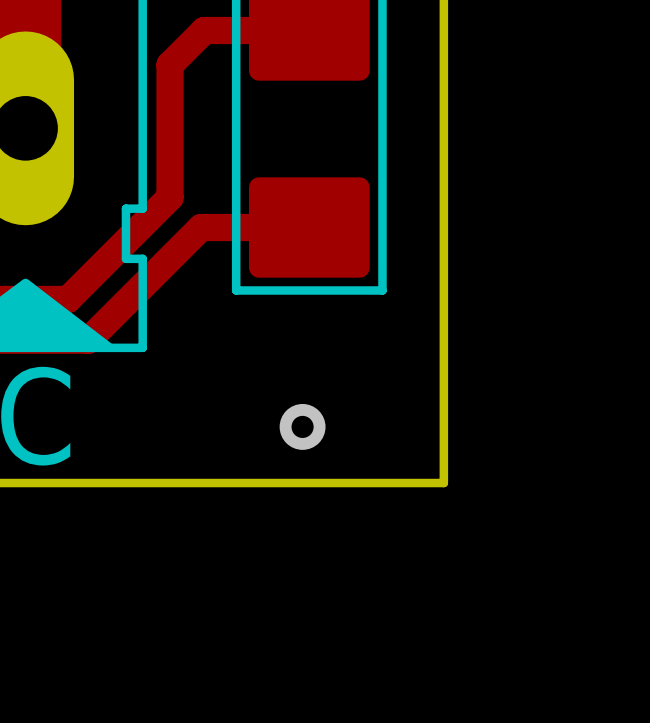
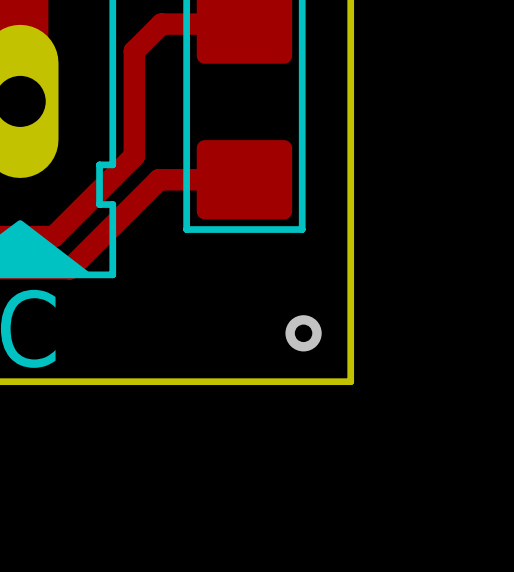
via position: (302, 426) -> (303, 333)

